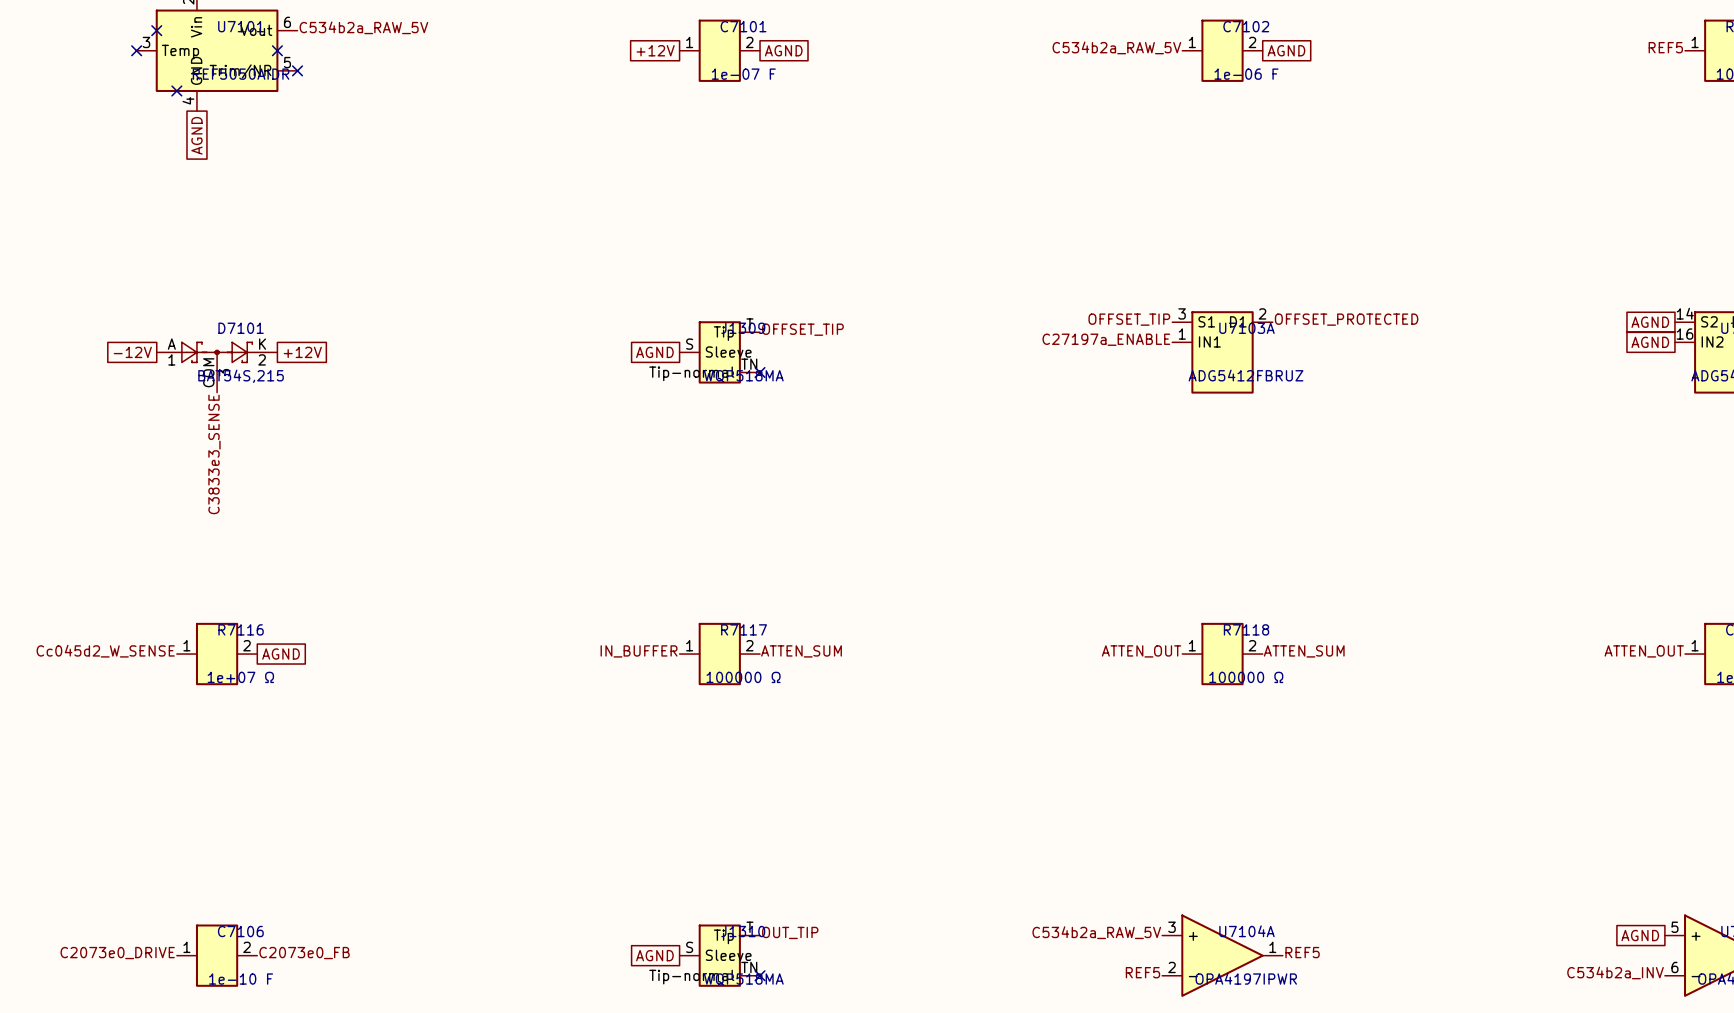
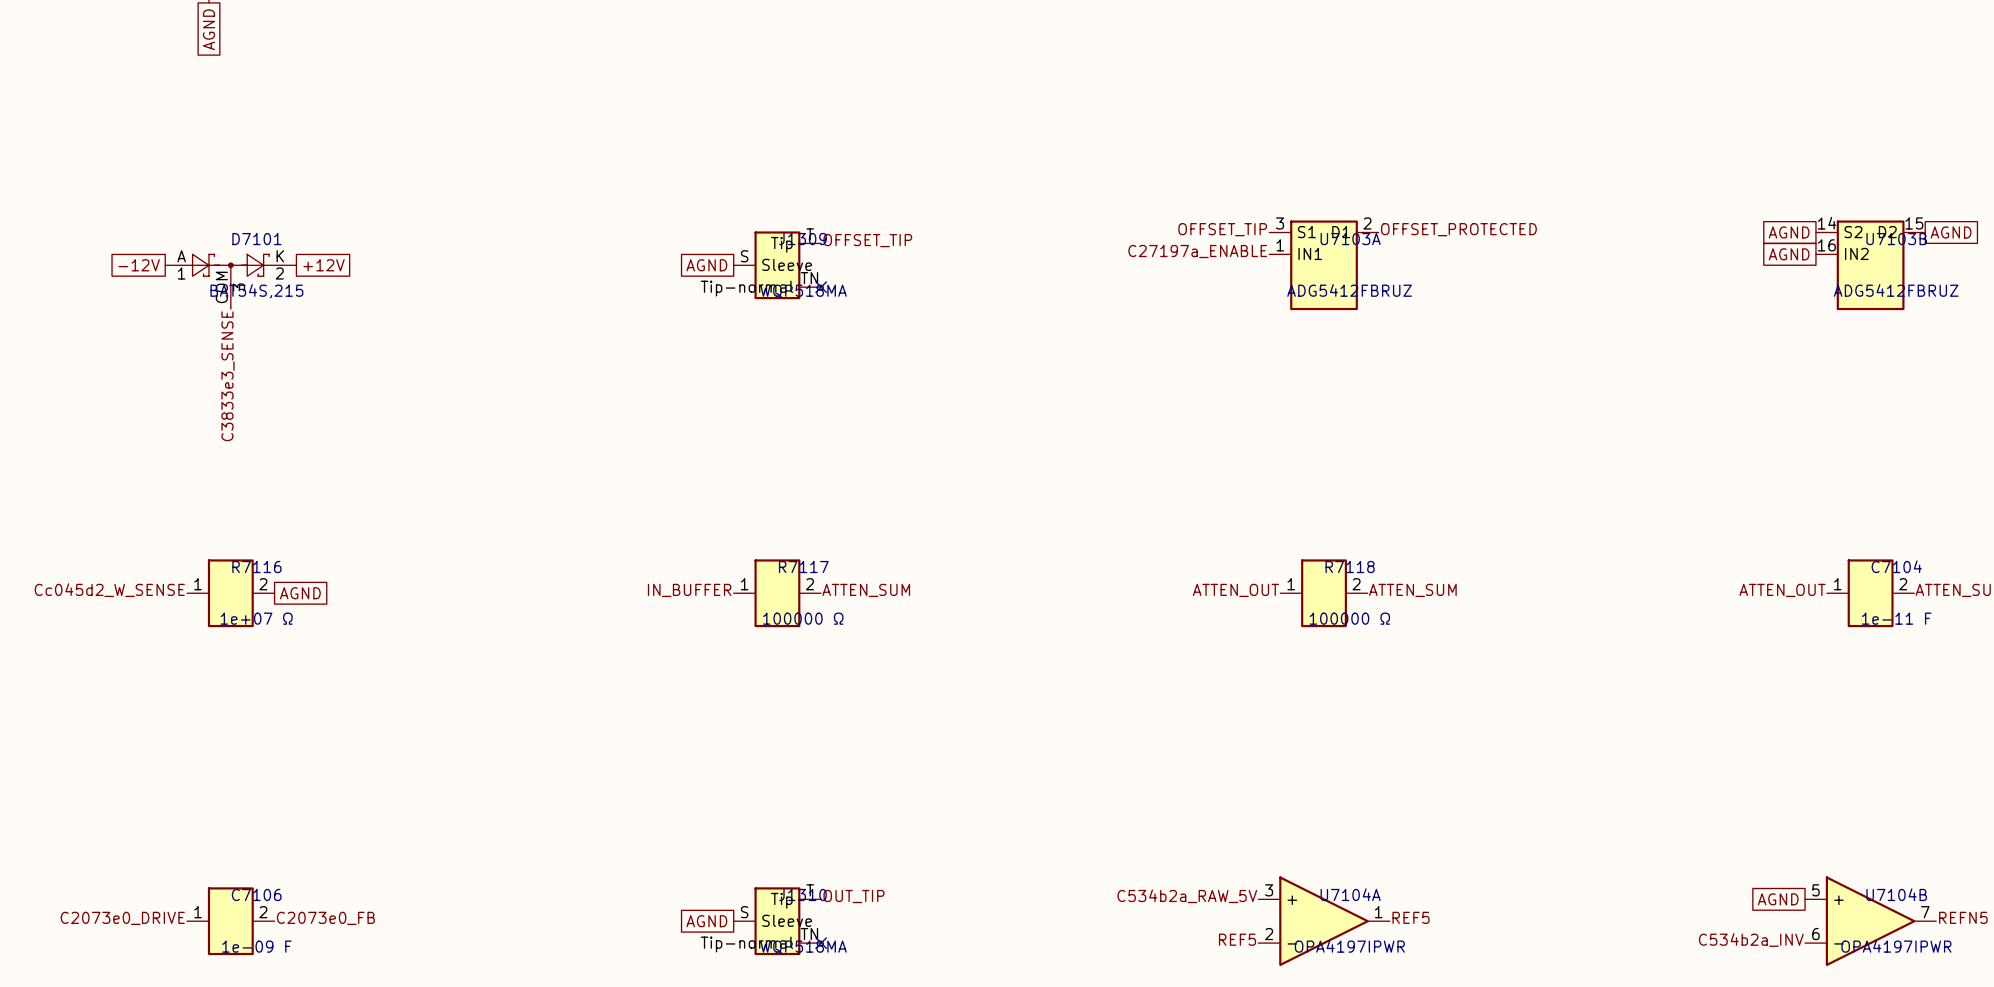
C7106 value: 1e-10 F (241, 979) -> 1e-09 F (256, 946)

